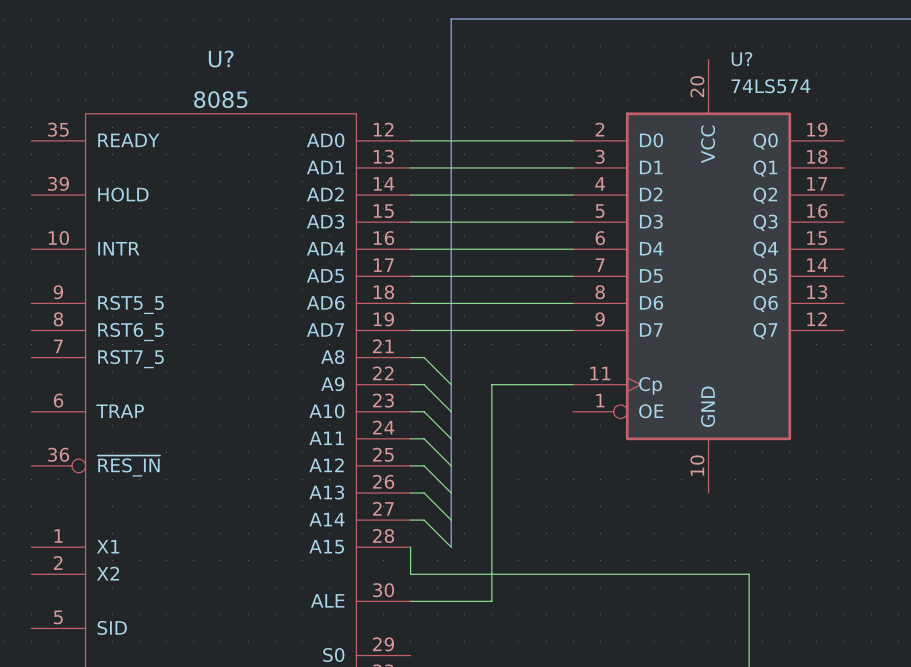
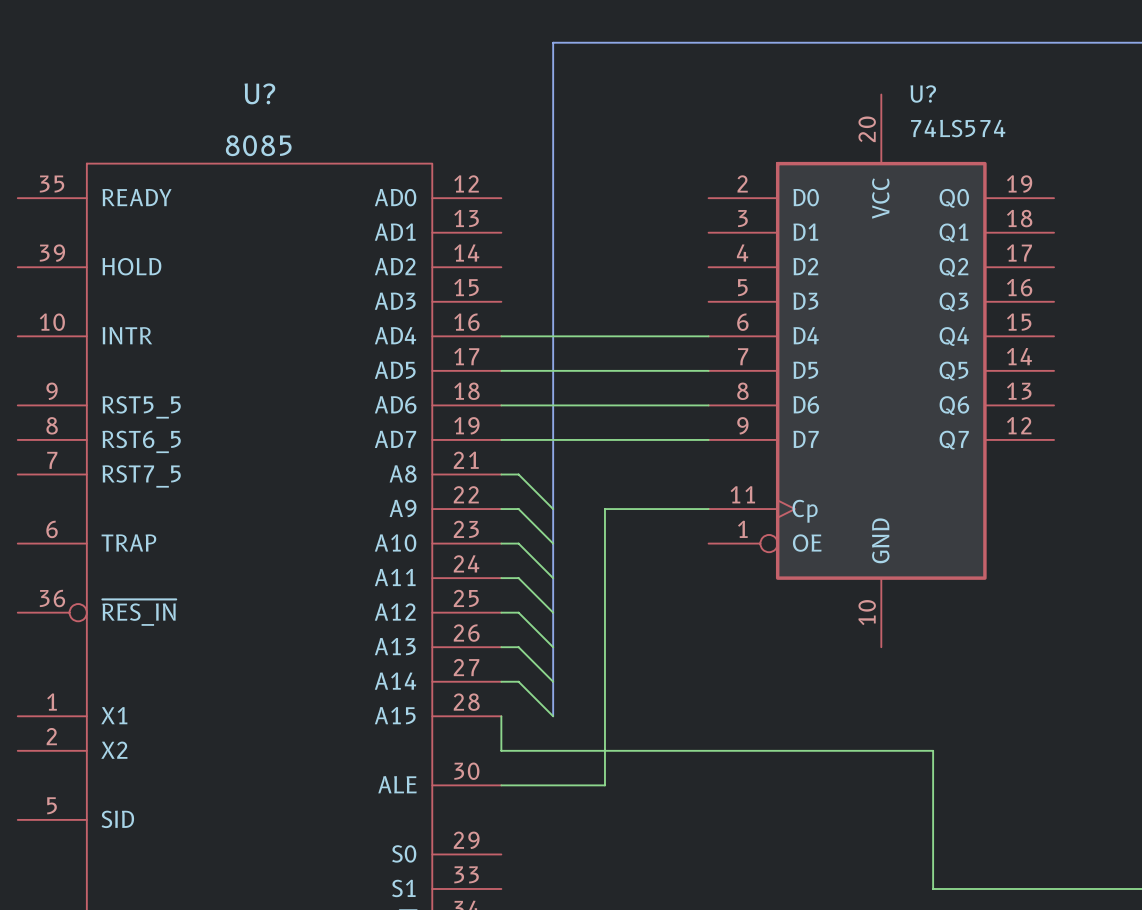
wire: (410, 140) (573, 140) -> none
wire: (410, 167) (573, 167) -> none
wire: (410, 195) (573, 195) -> none
wire: (410, 222) (573, 222) -> none

